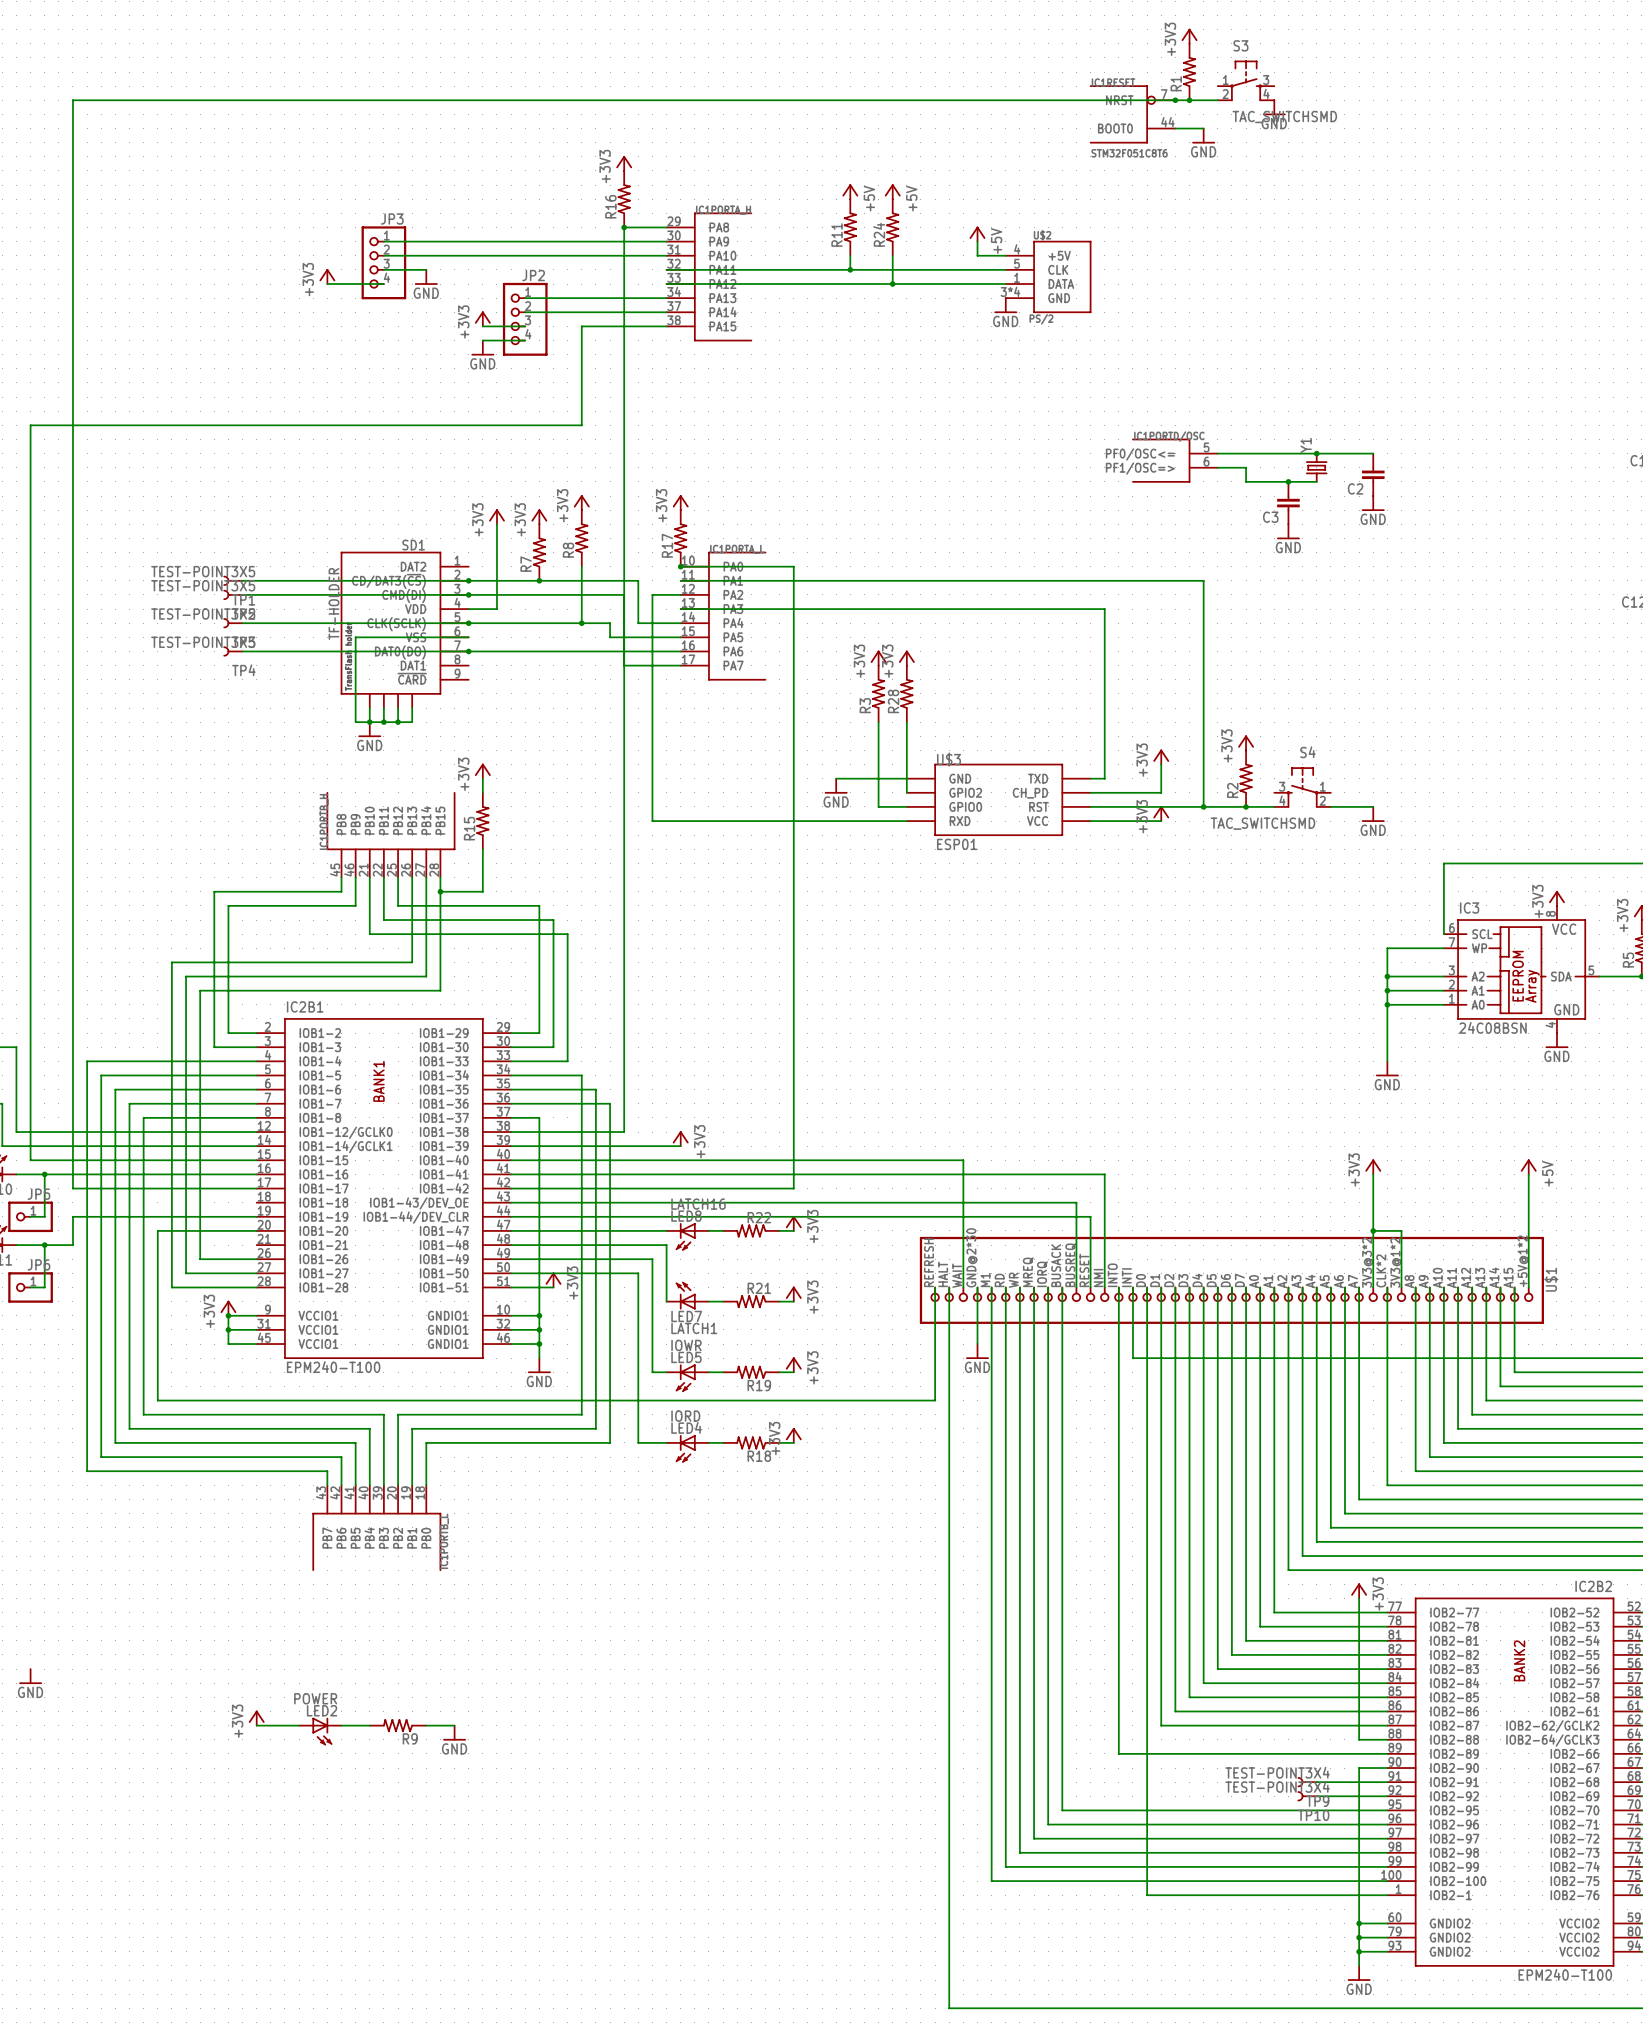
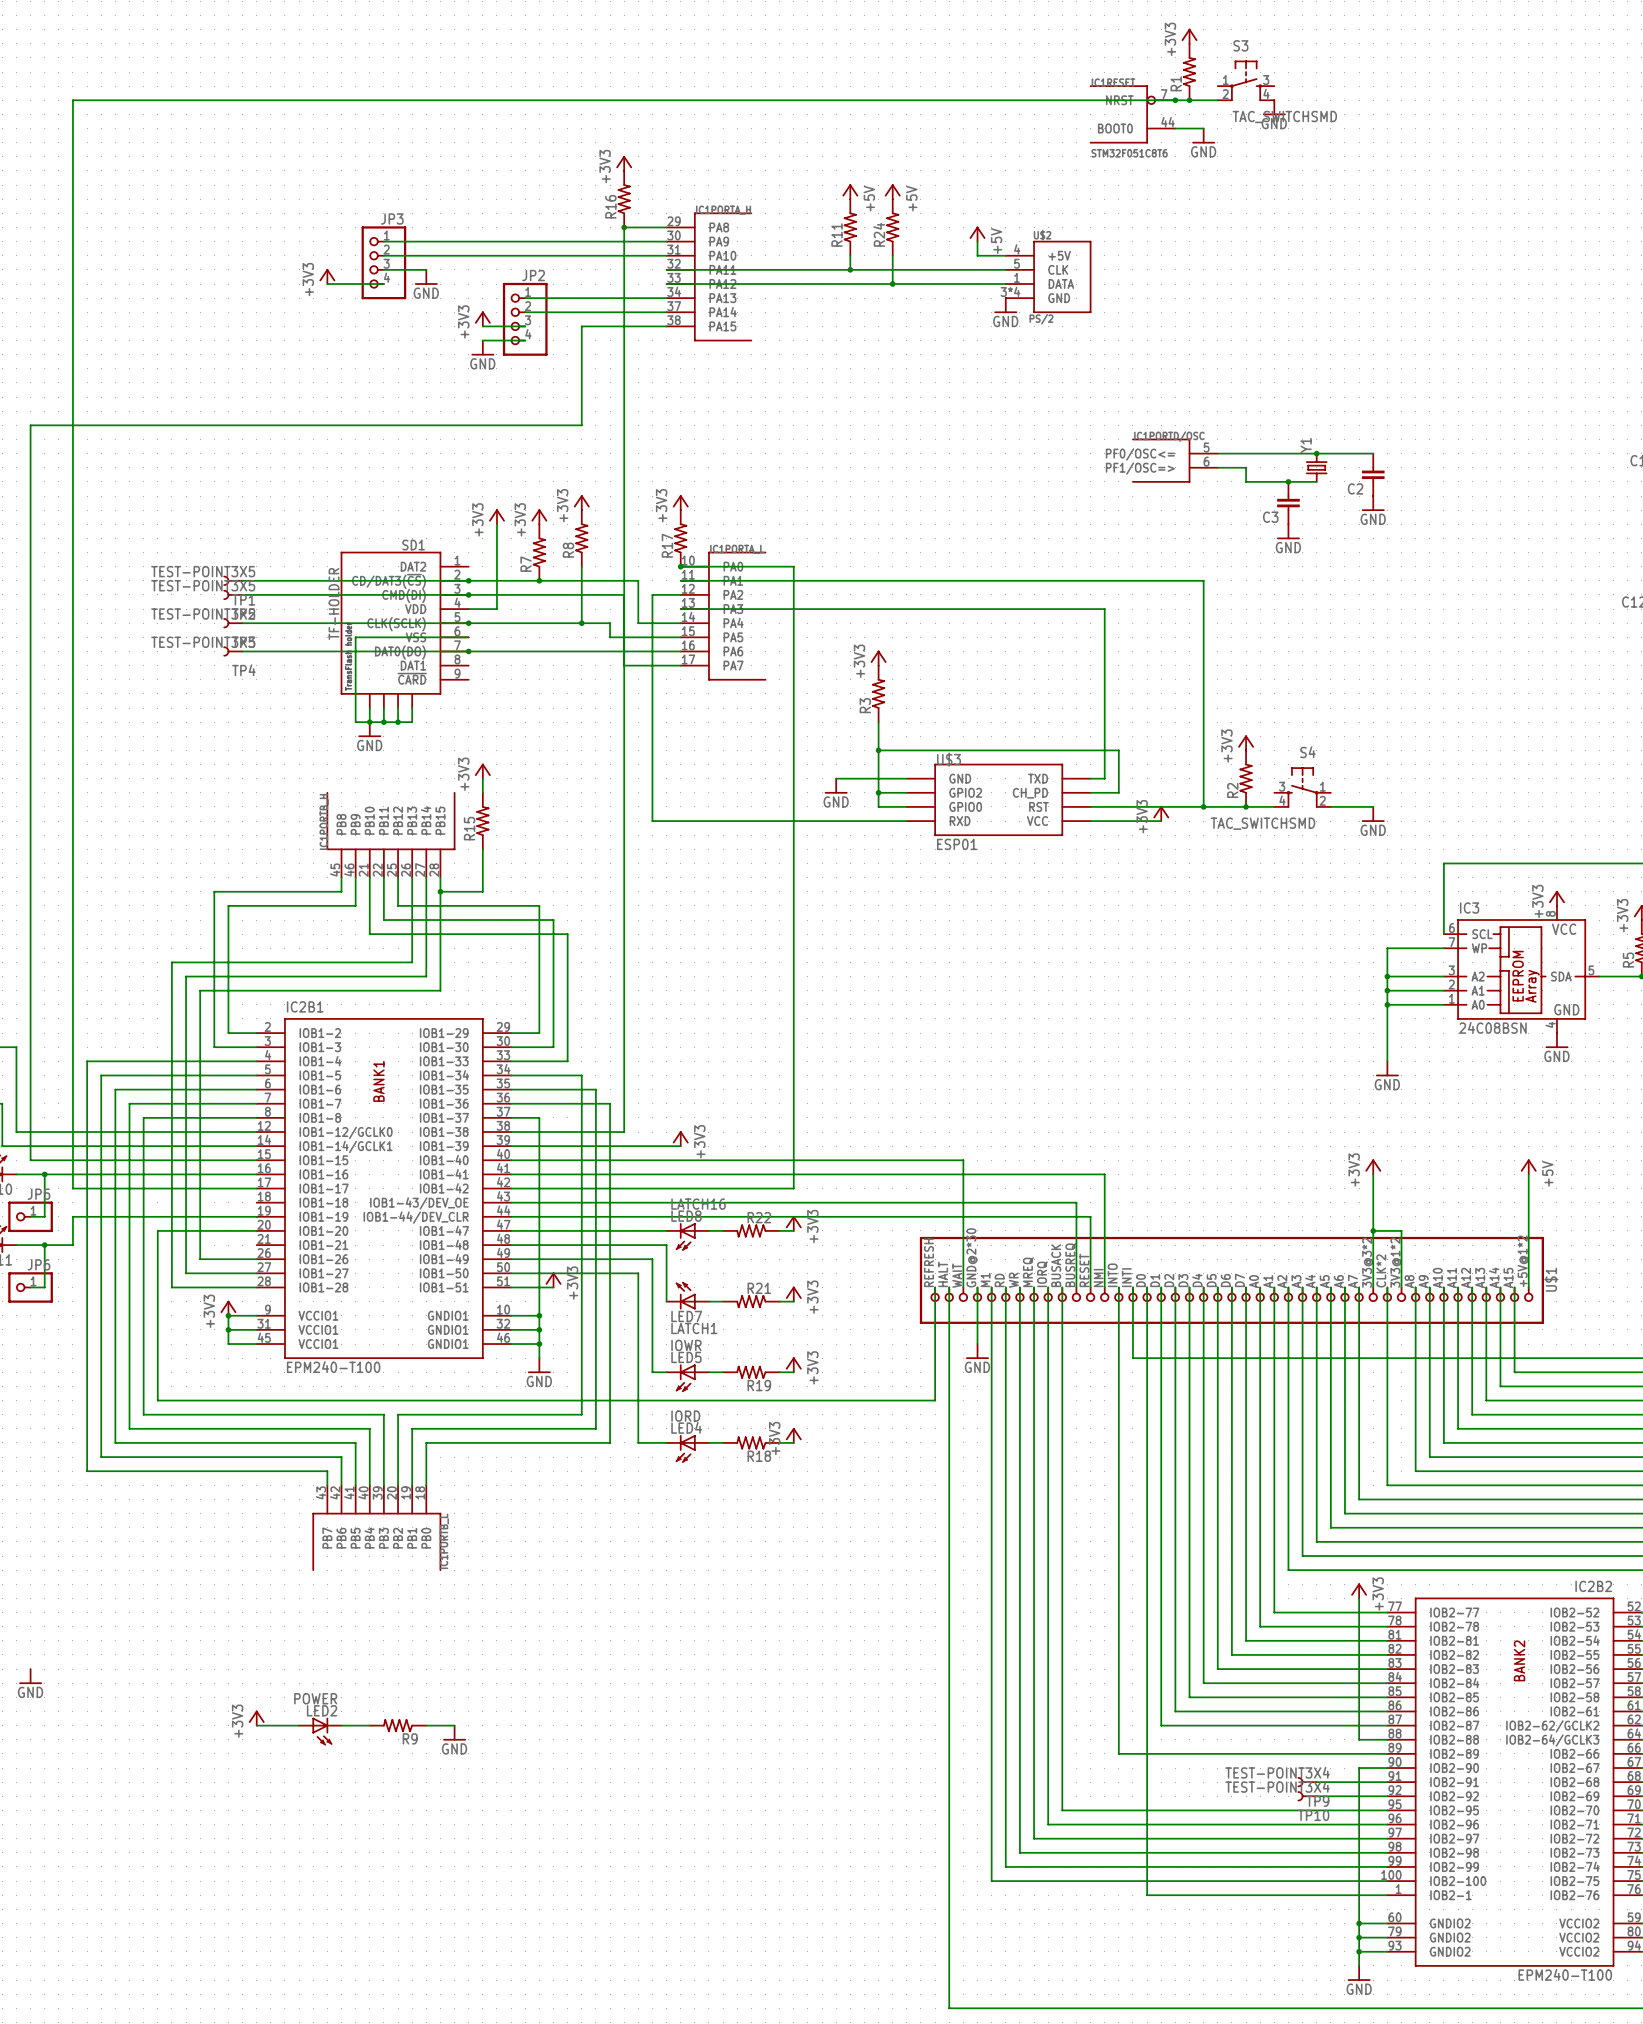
power symbol: +3V3 (906, 658) -> none
R28: (906, 693) -> none
wire: (906, 722) (906, 792) -> (878, 792) (906, 792)
junction: none -> (878, 750)
power symbol: +3V3 (1161, 757) -> none
wire: (1161, 764) (1161, 792) (1118, 792) -> (878, 750) (1118, 750) (1118, 792)
junction: none -> (878, 792)

